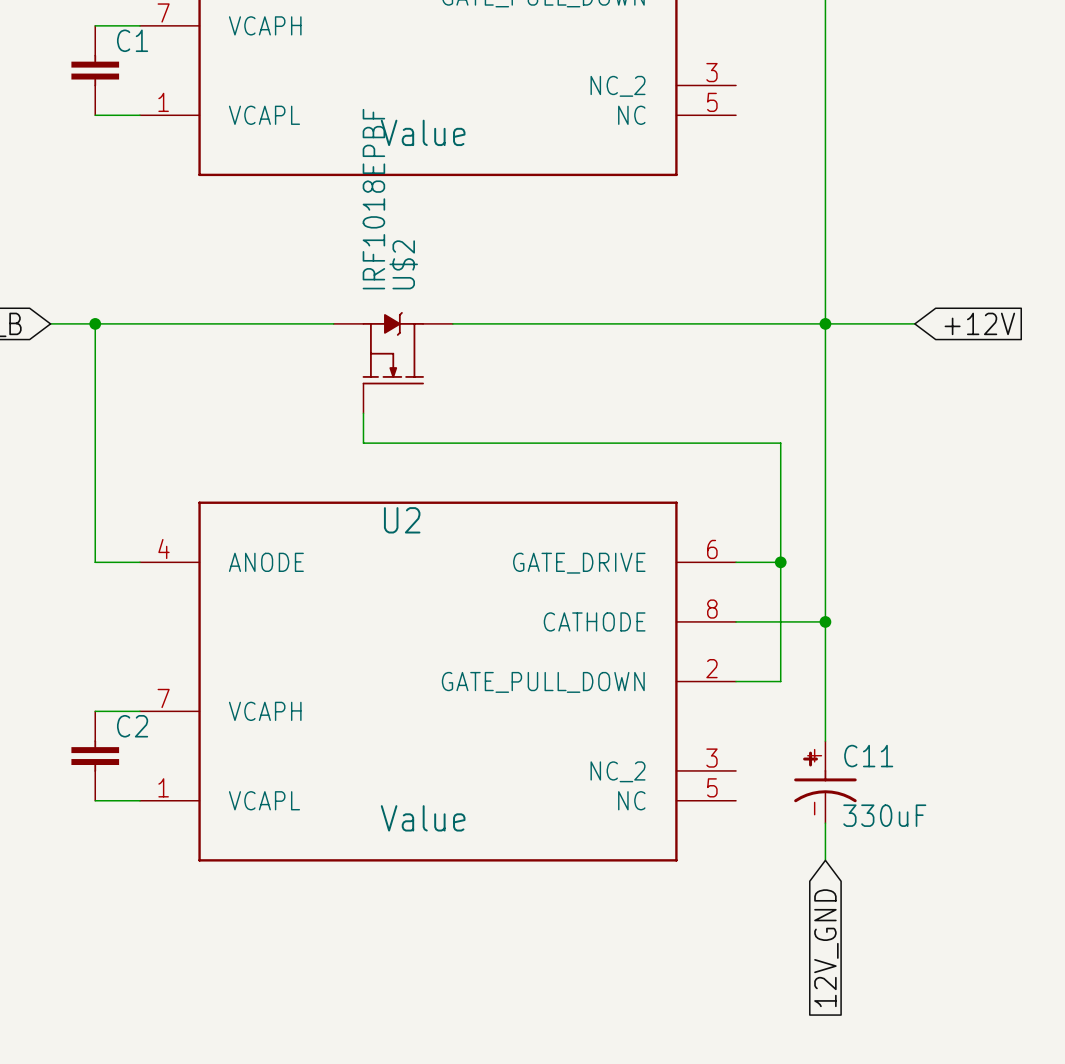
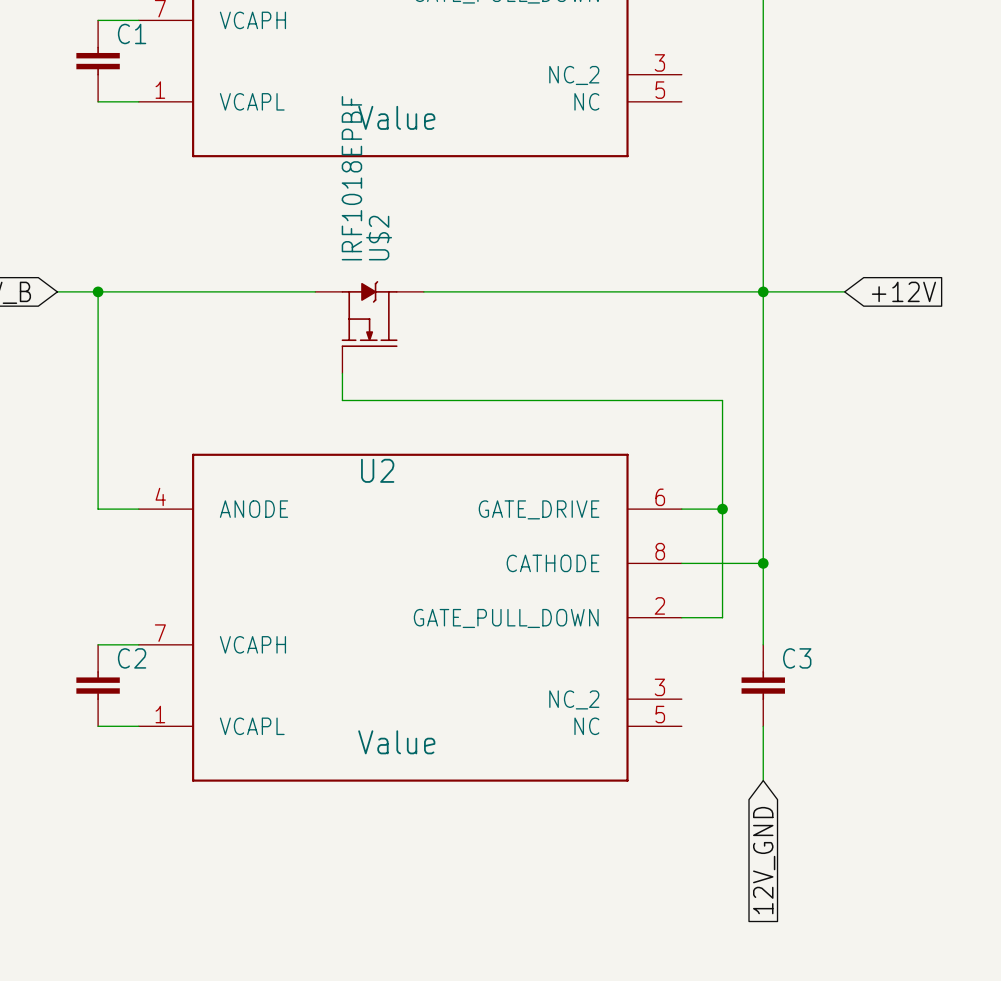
C3: none -> (763, 685)
C11: 330uF (825, 782) -> none

